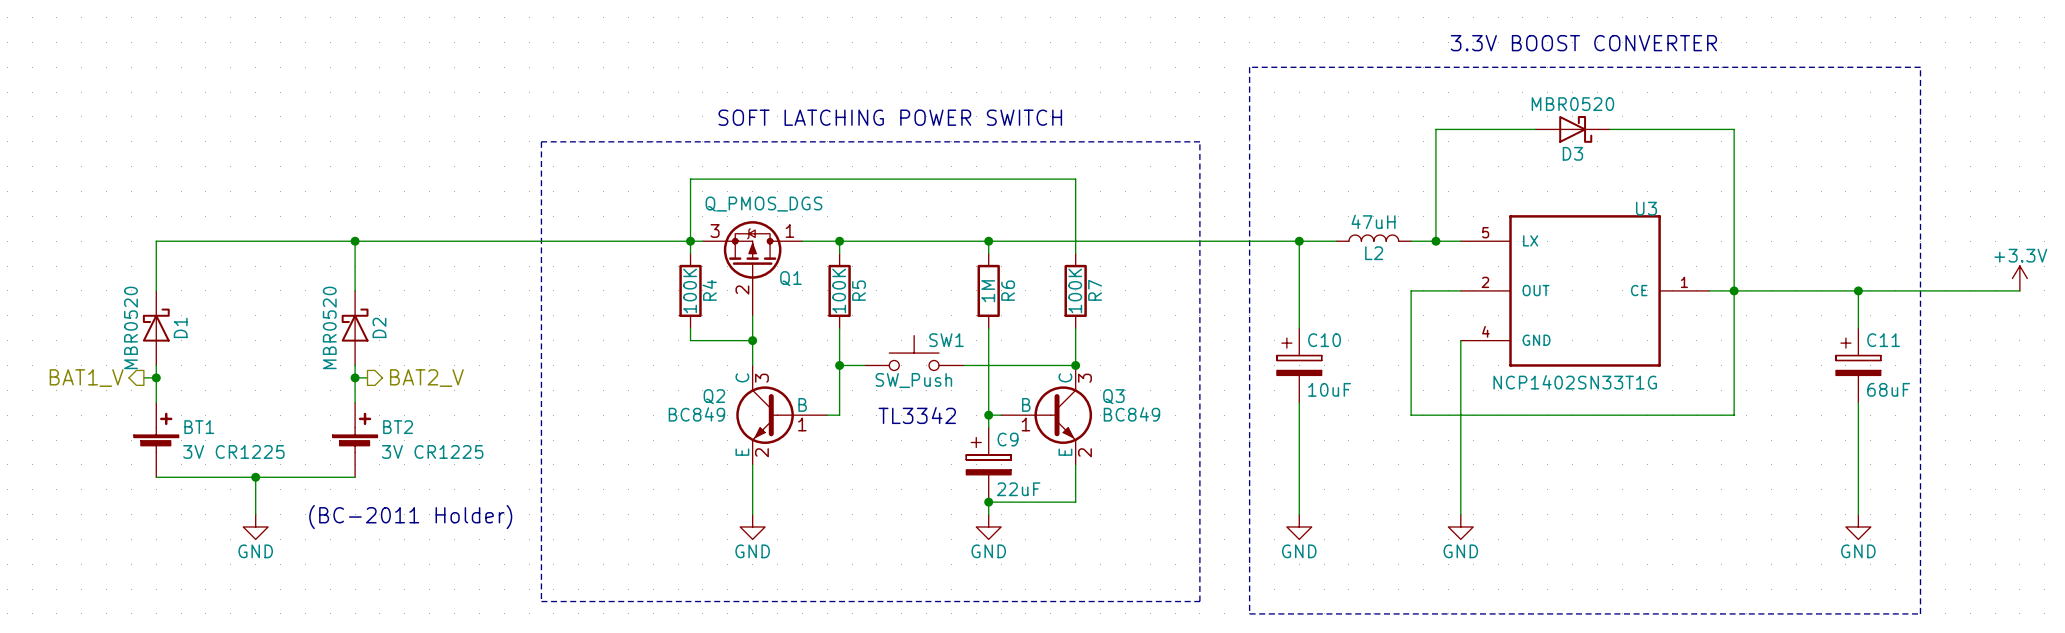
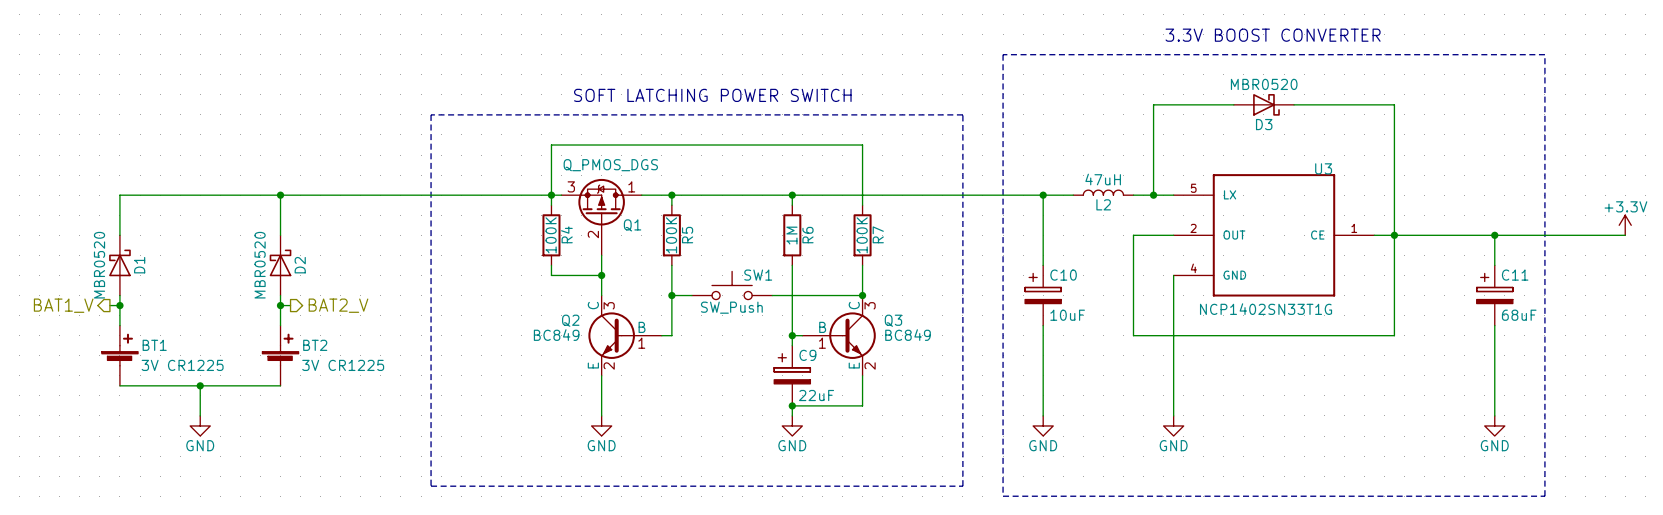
text: TL3342 (917, 415) -> none
text: (BC-2011 Holder) (410, 517) -> none

